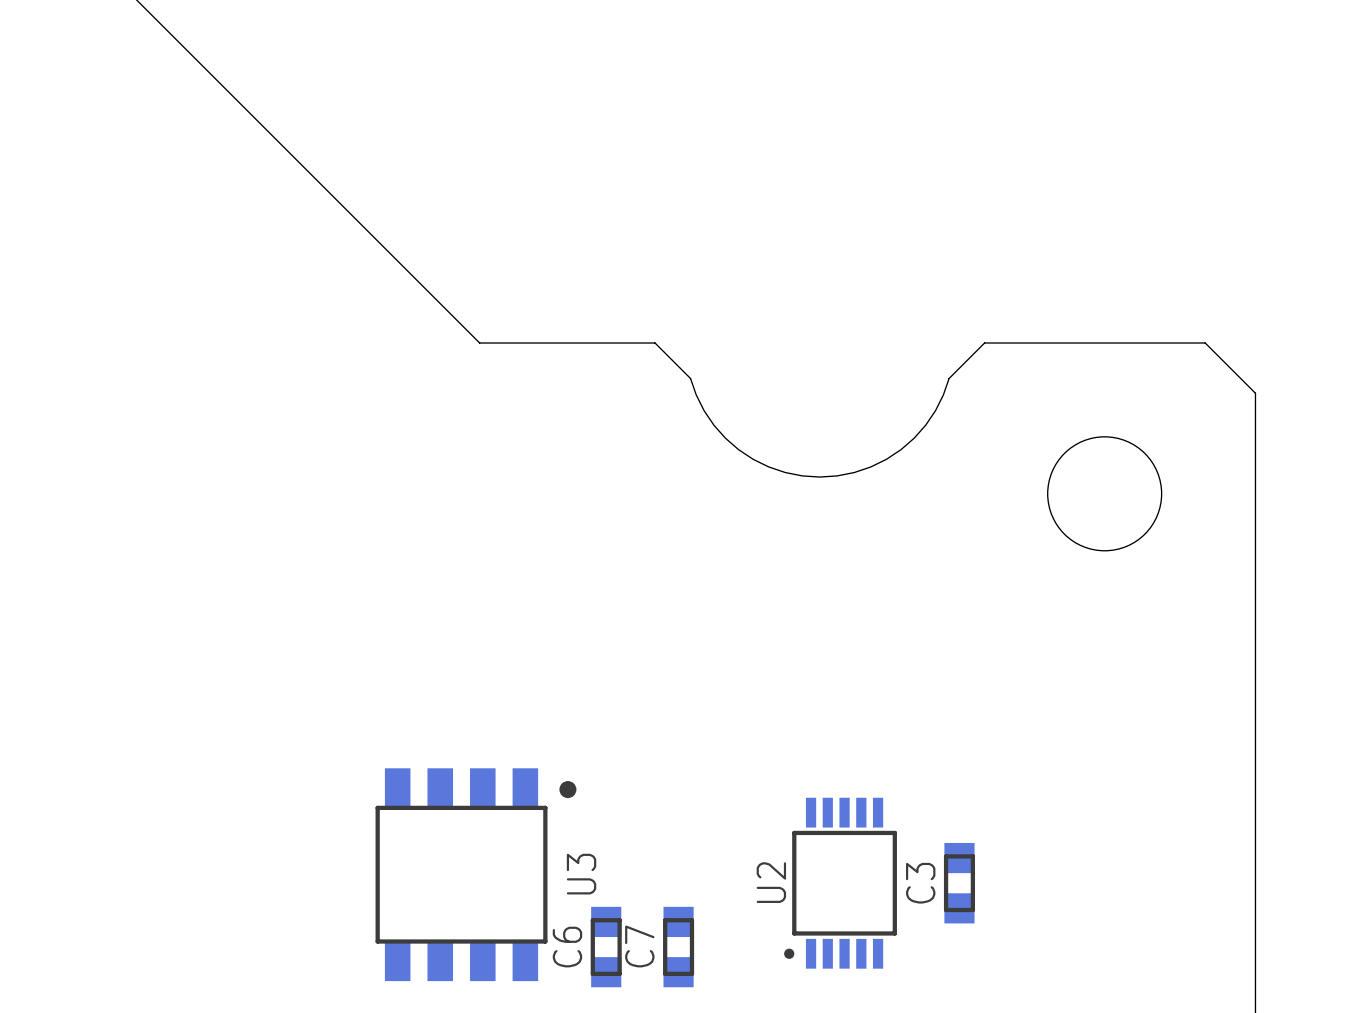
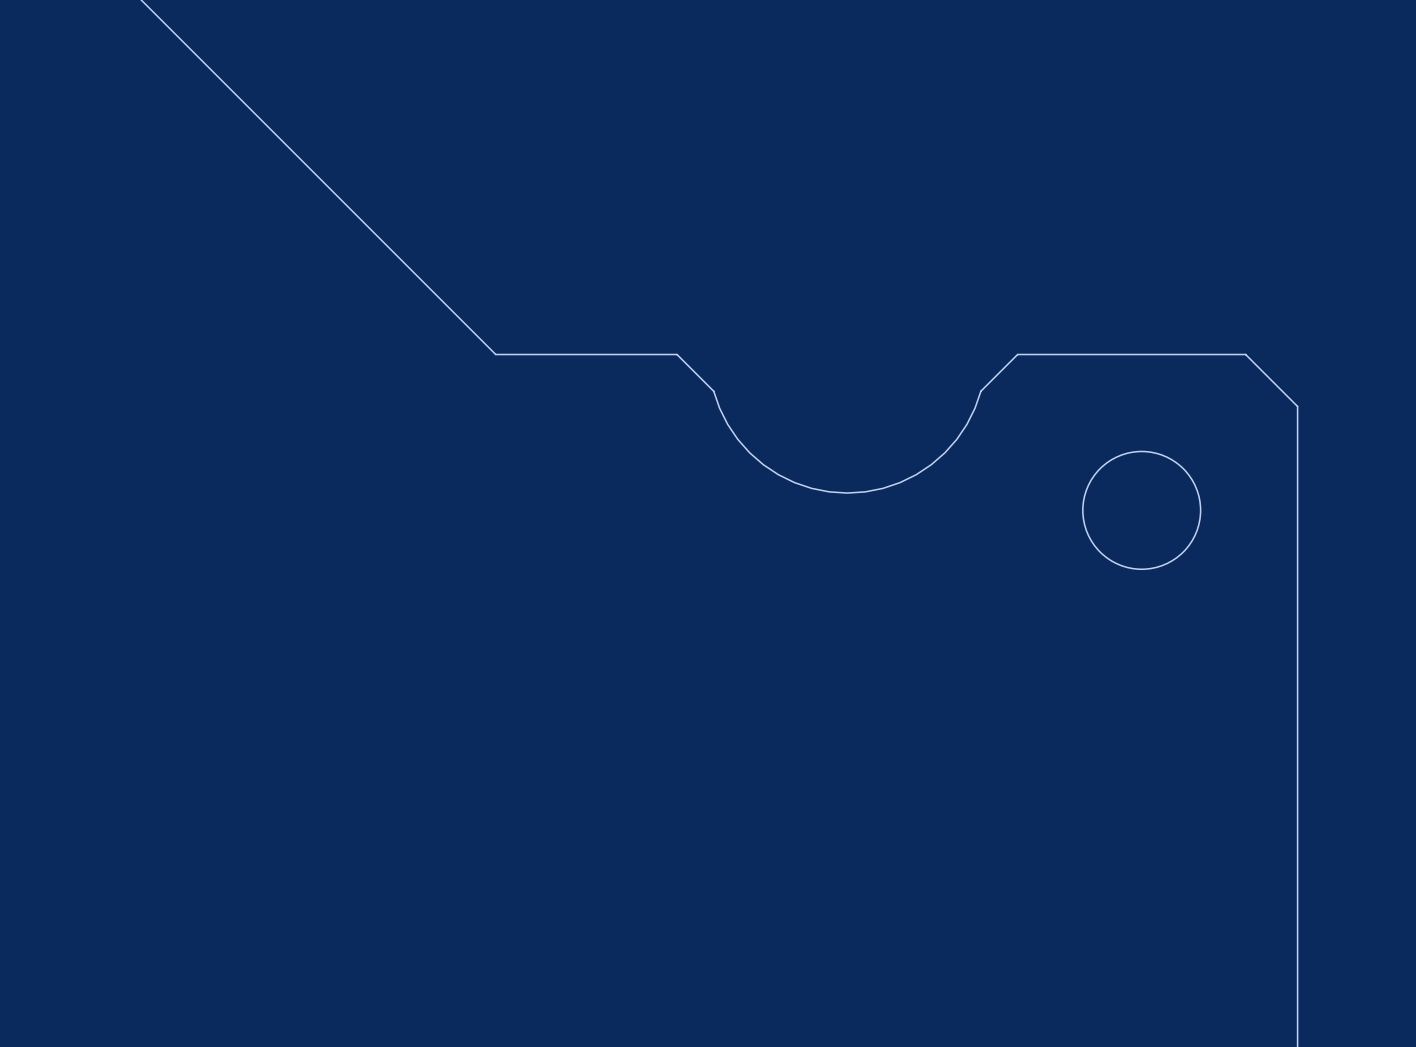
U3: (475, 874) -> none
U2: (840, 883) -> none
C3: (959, 883) -> none
C6: (606, 947) -> none
C7: (678, 947) -> none

